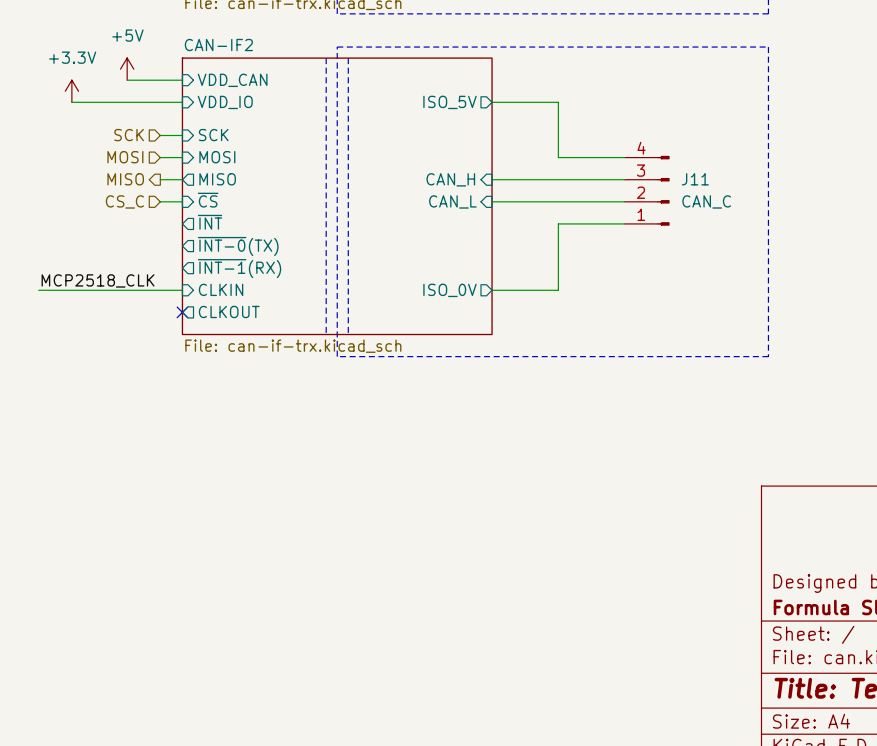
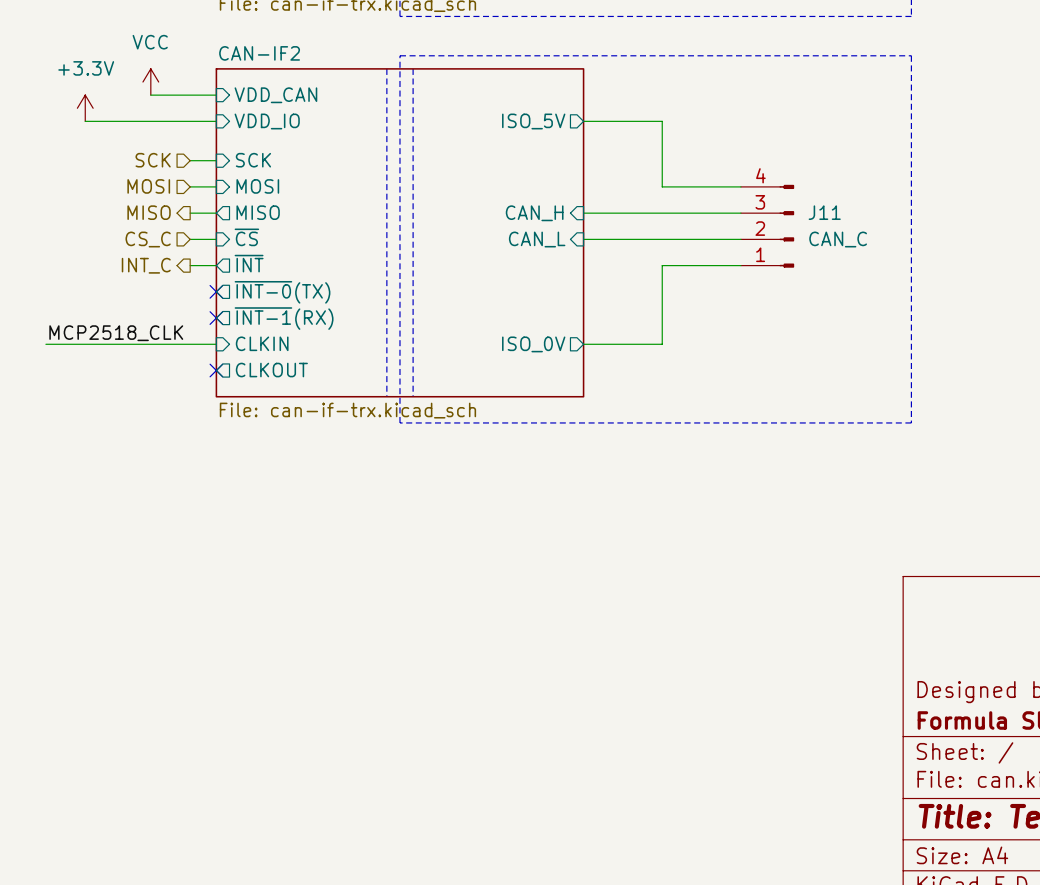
power symbol: +5V (127, 69) -> VCC (150, 82)
wire: none -> (190, 265) (216, 265)
hierarchical label: none -> INT_C (146, 265)
no-connect mark: none -> (216, 291)
no-connect mark: none -> (216, 318)

